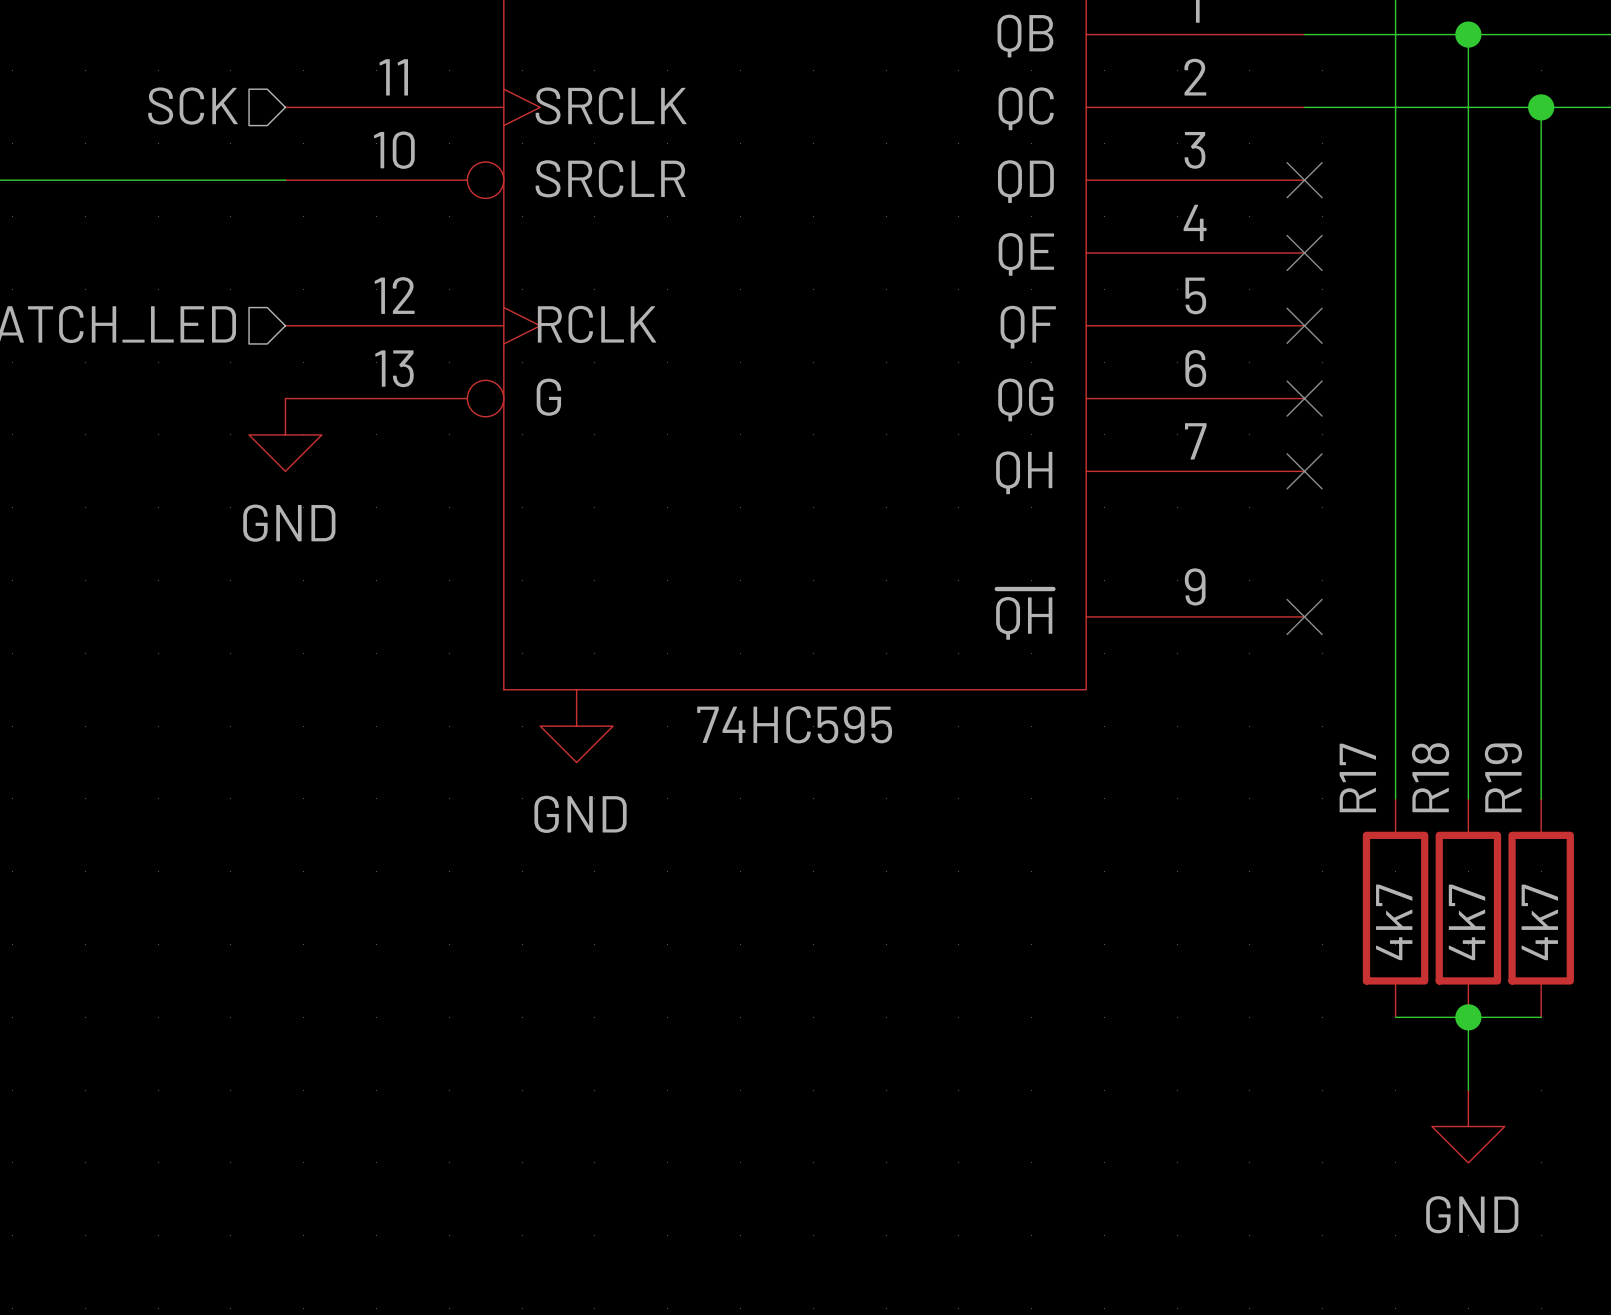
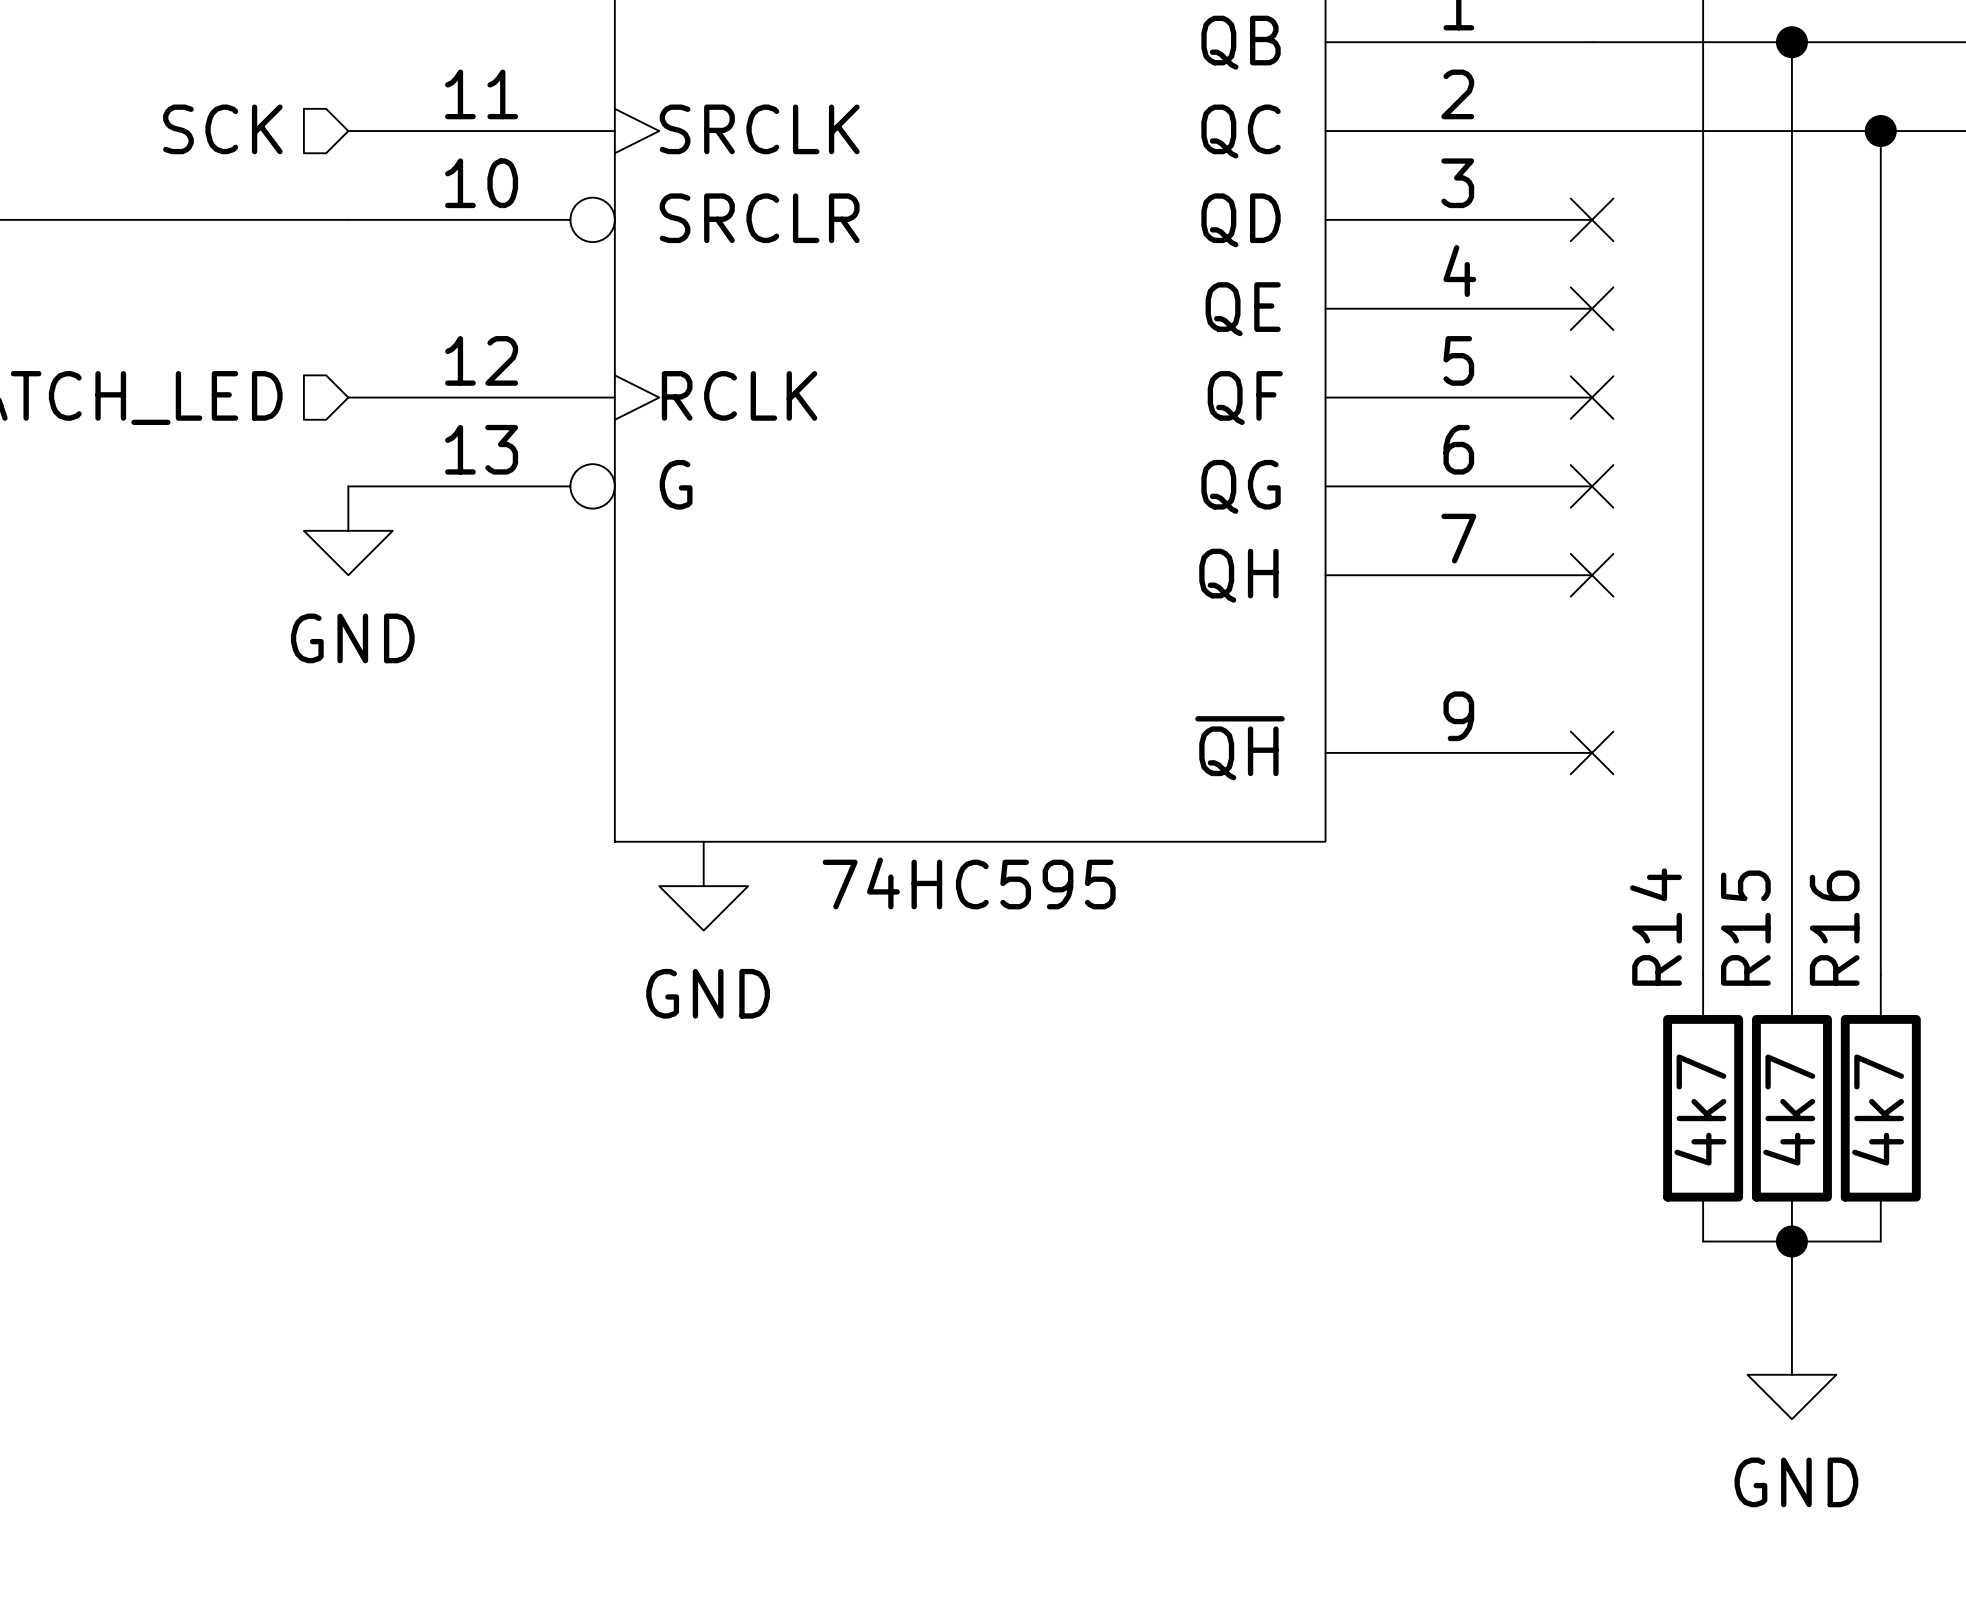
R17 name: R17 (1357, 777) -> R14 (1655, 927)
R18 name: R18 (1430, 777) -> R15 (1745, 928)
R19 name: R19 (1503, 777) -> R16 (1834, 928)

